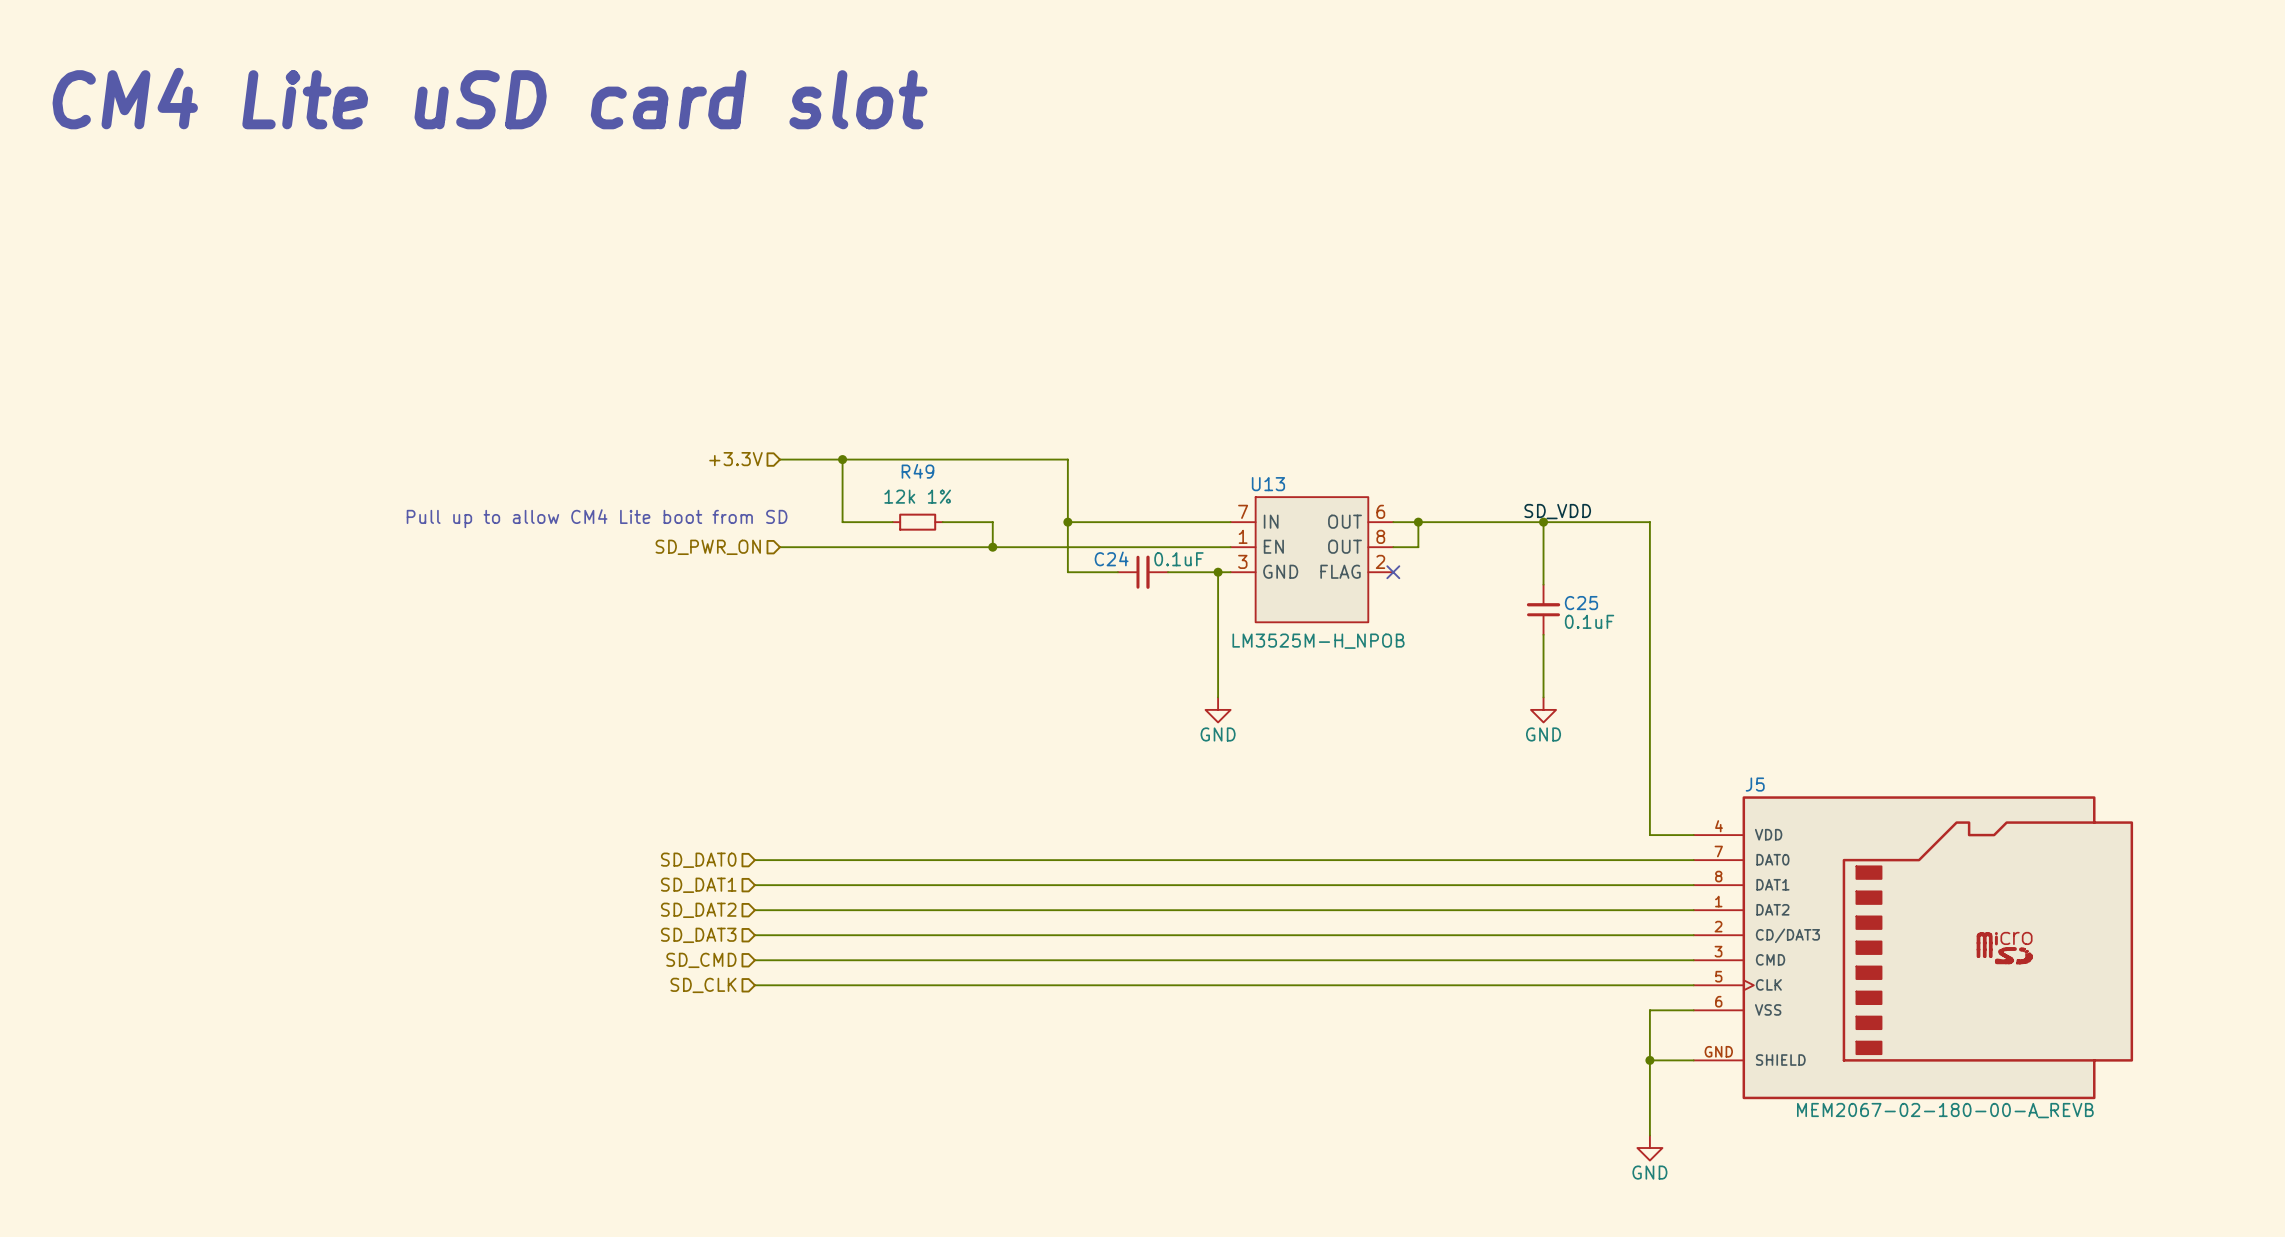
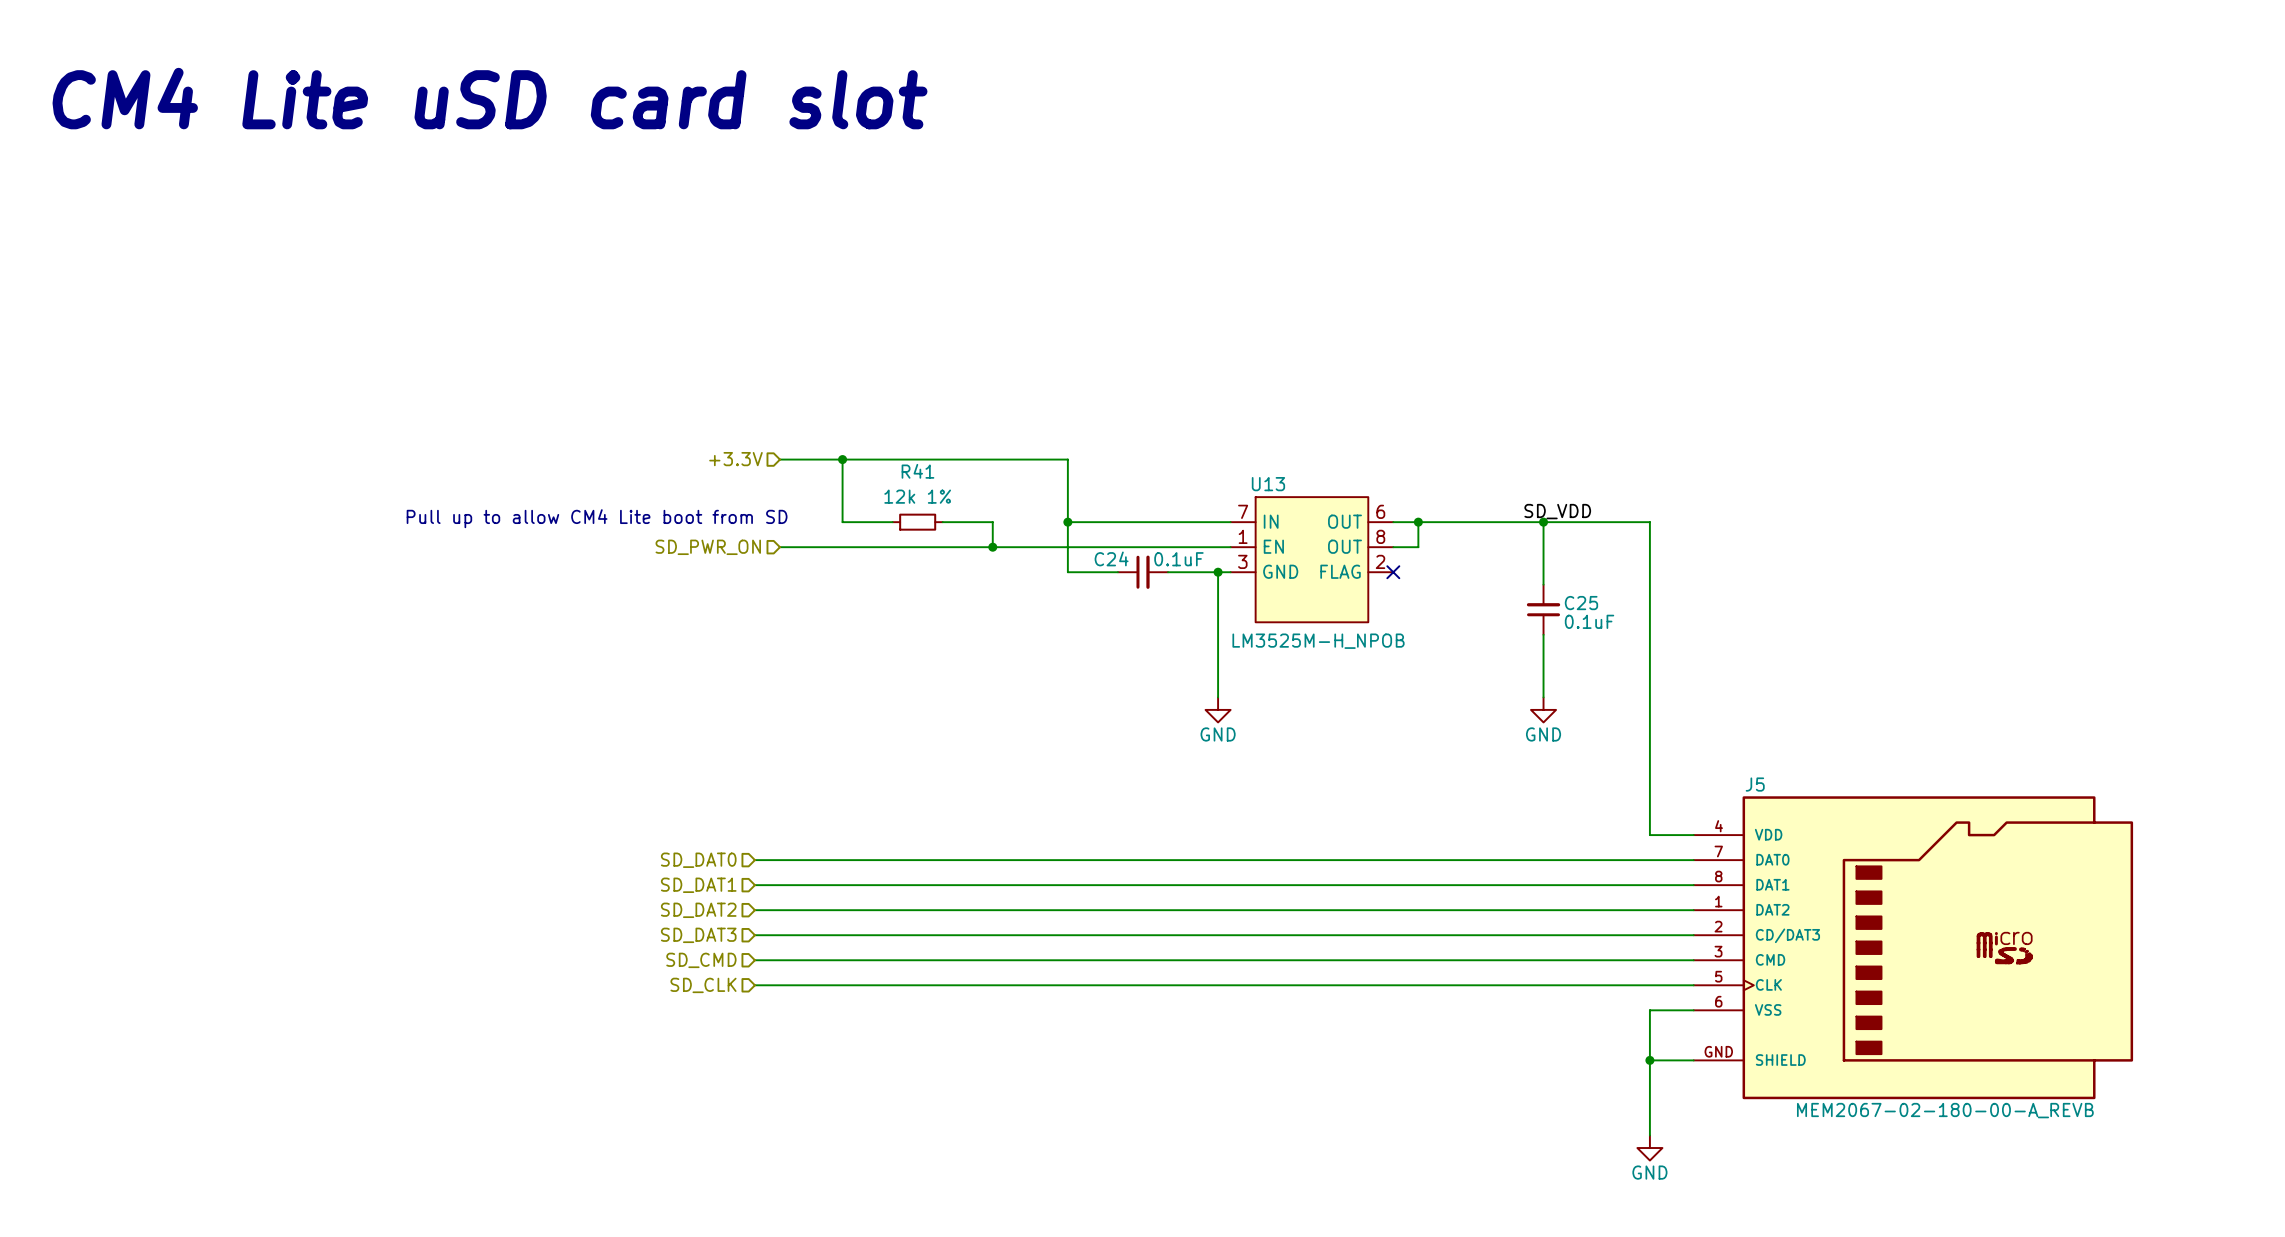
R49 name: R49 (917, 471) -> R41 (917, 471)

